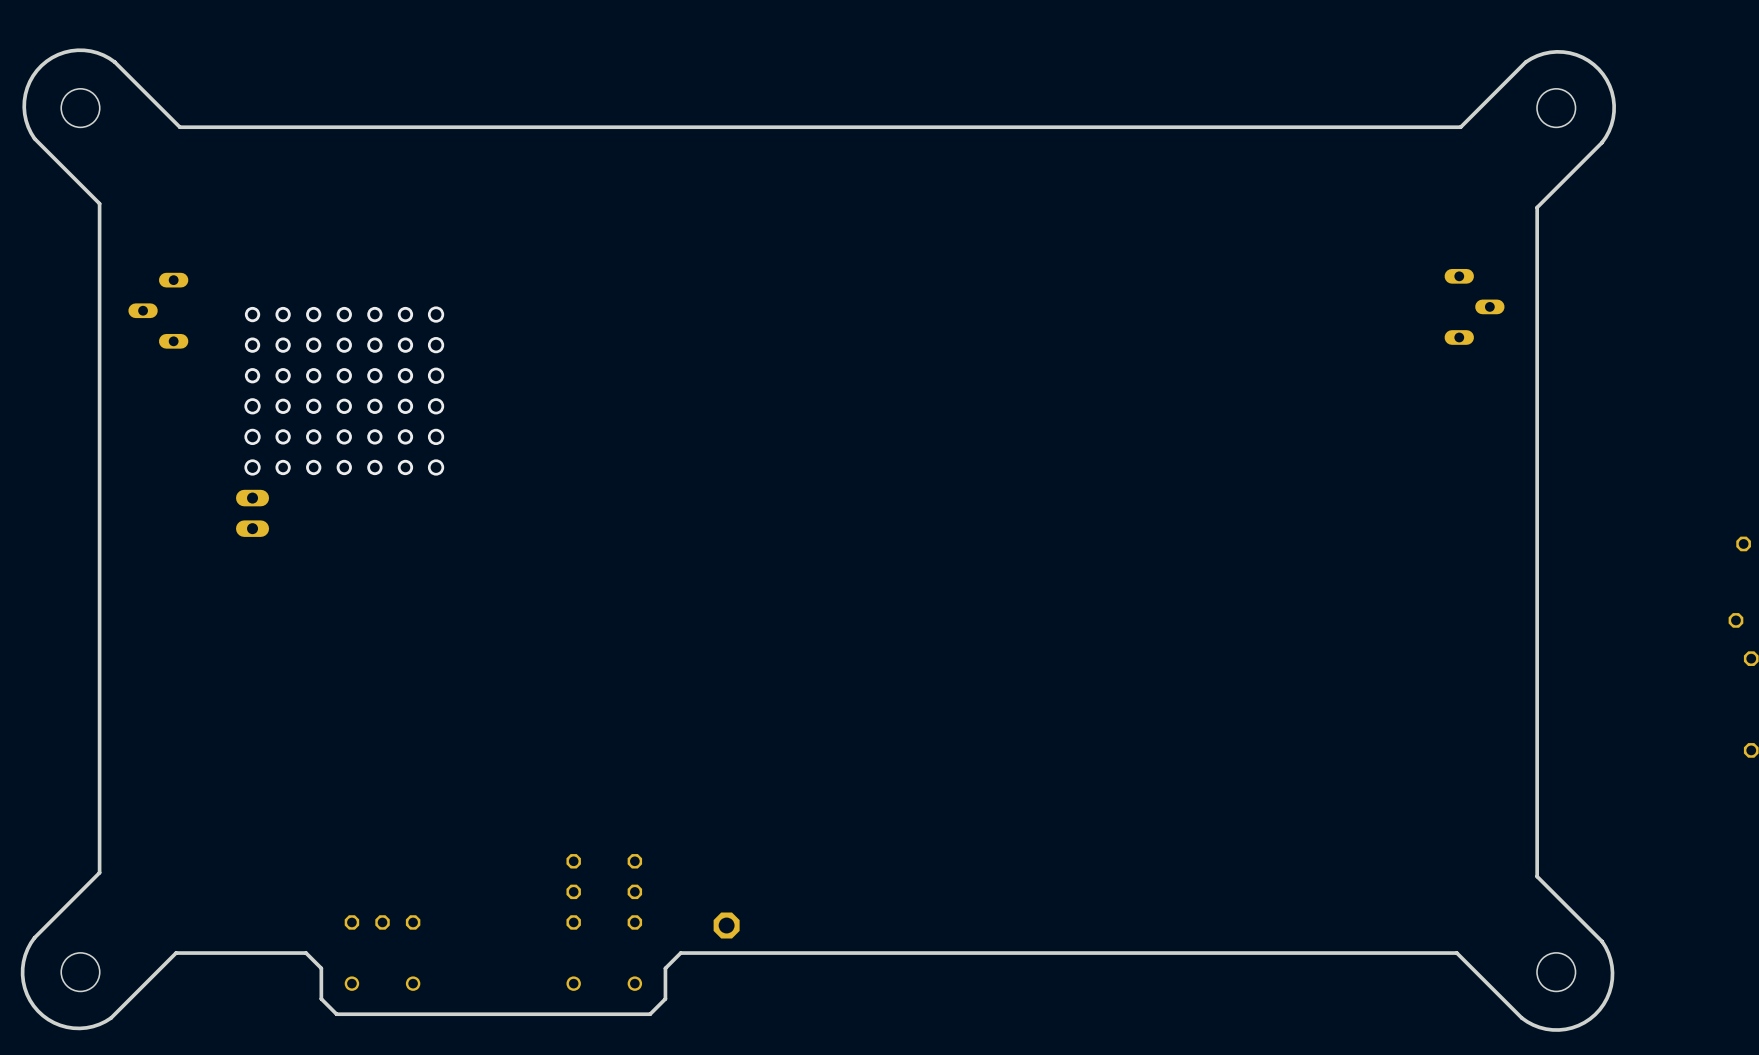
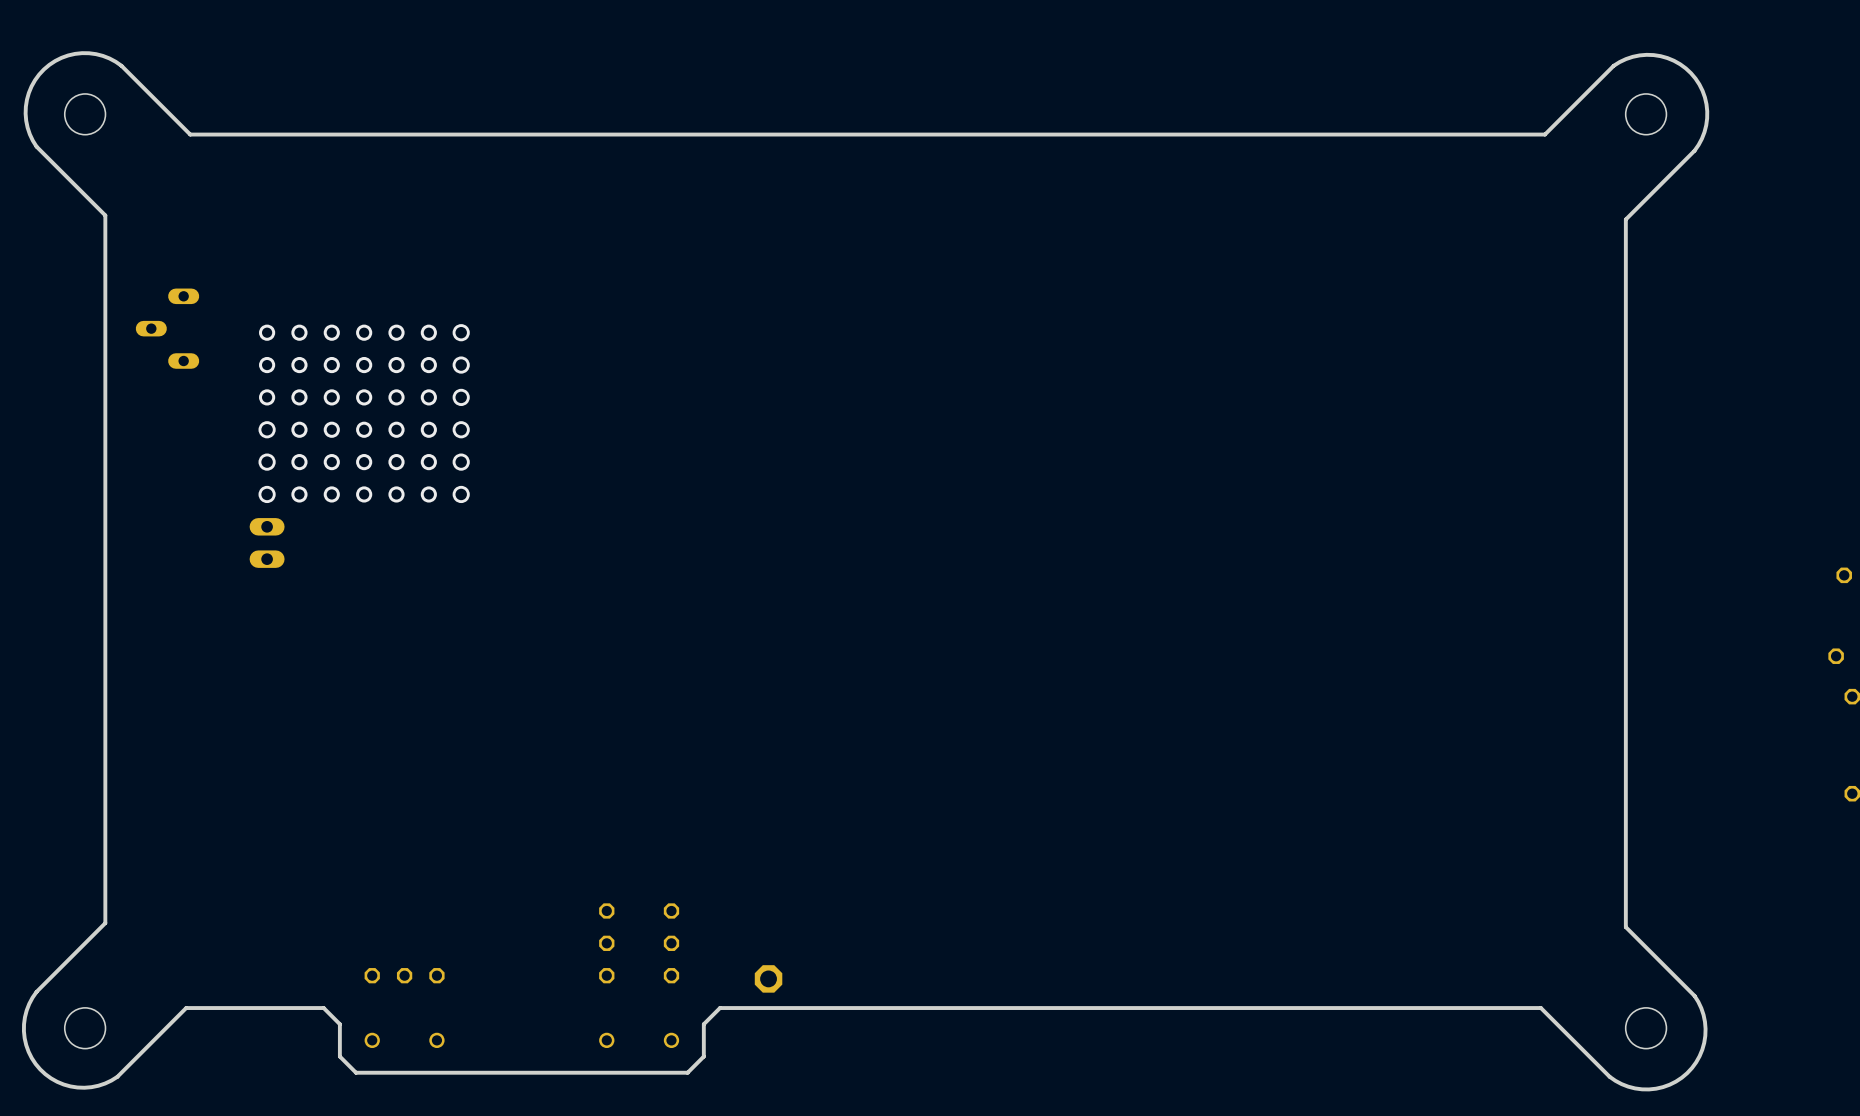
part: (1474, 306) -> none

